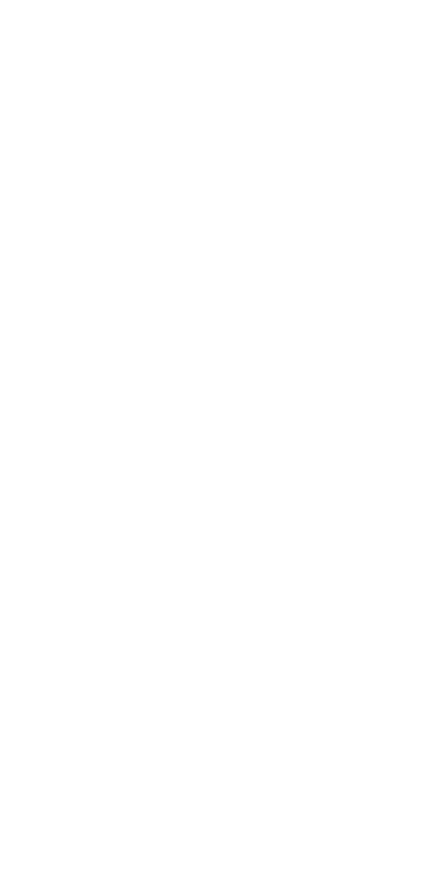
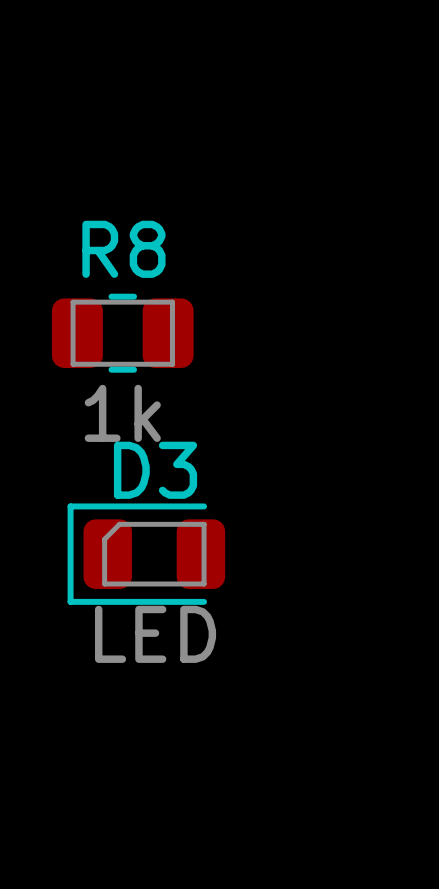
R8: none -> 1k (122, 333)
D3: none -> LED (146, 554)

